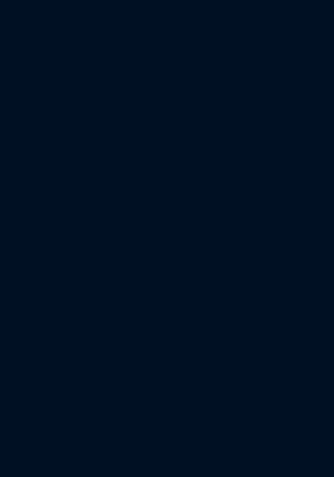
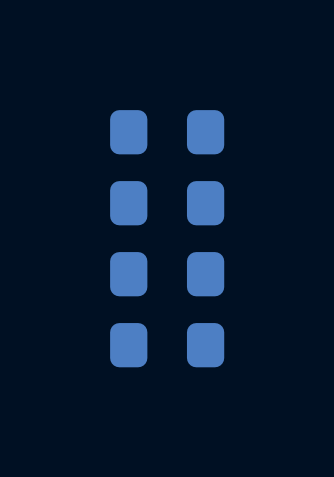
part: none -> (167, 132)
part: none -> (167, 203)
part: none -> (167, 274)
part: none -> (167, 345)

